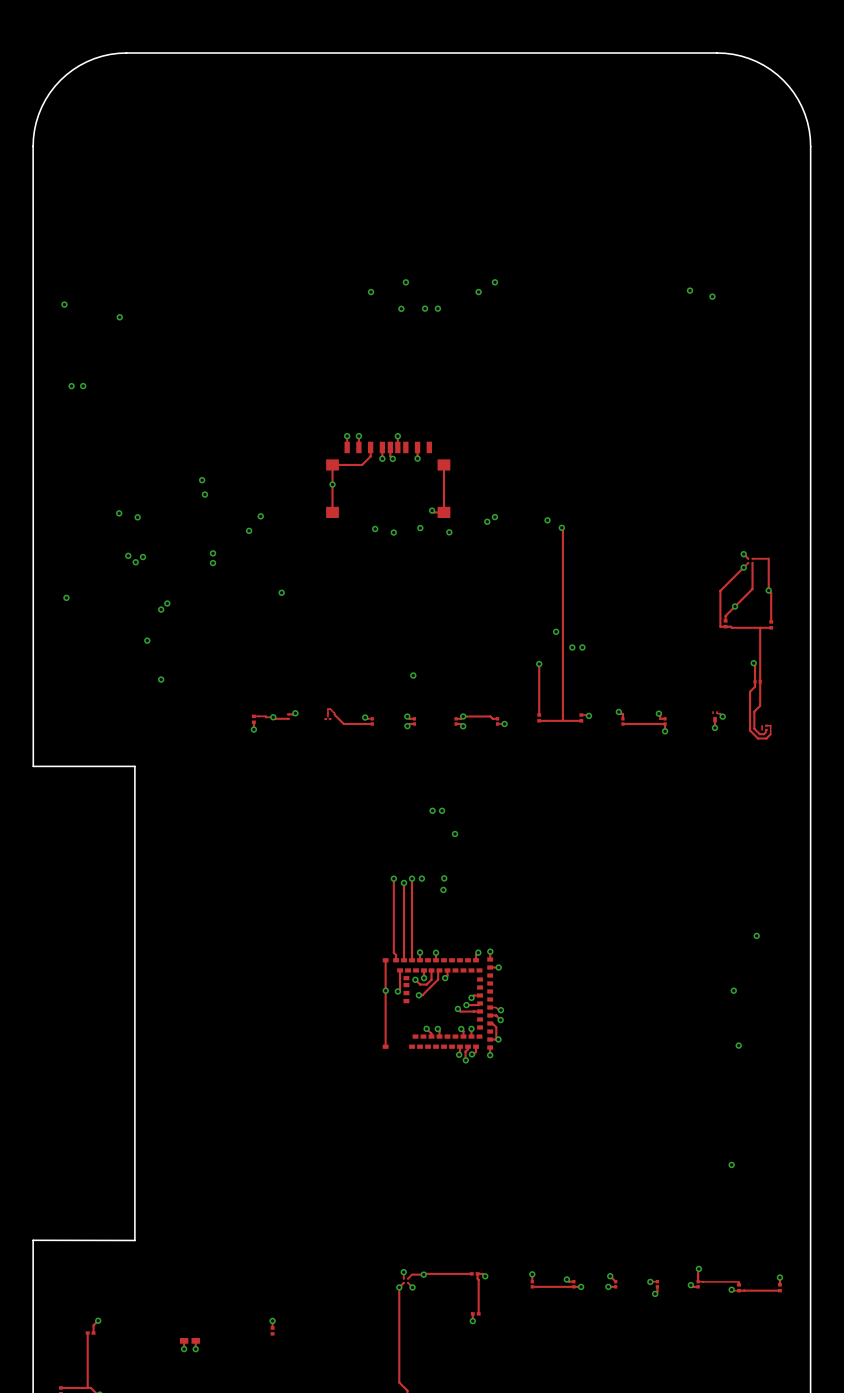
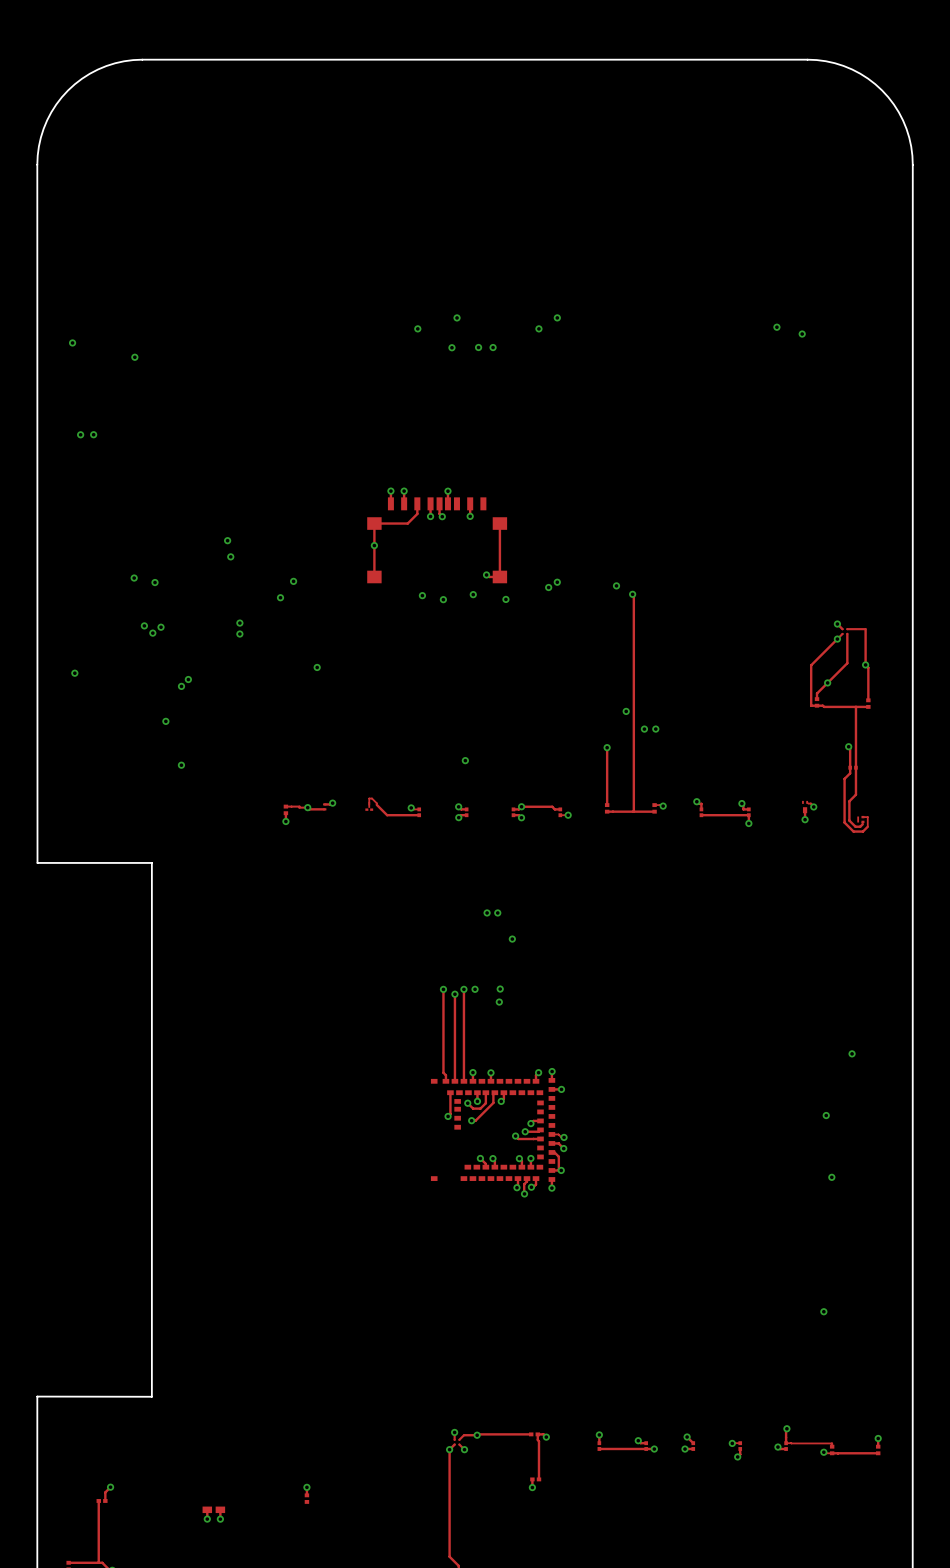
track: (385, 960) (385, 1046) -> none
via: (385, 990) -> none

